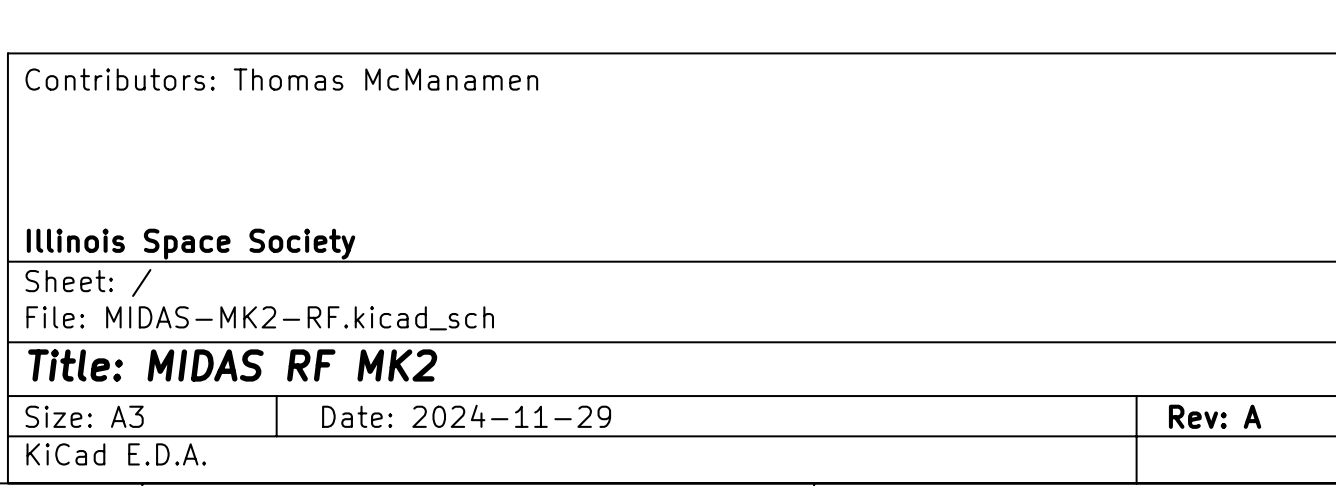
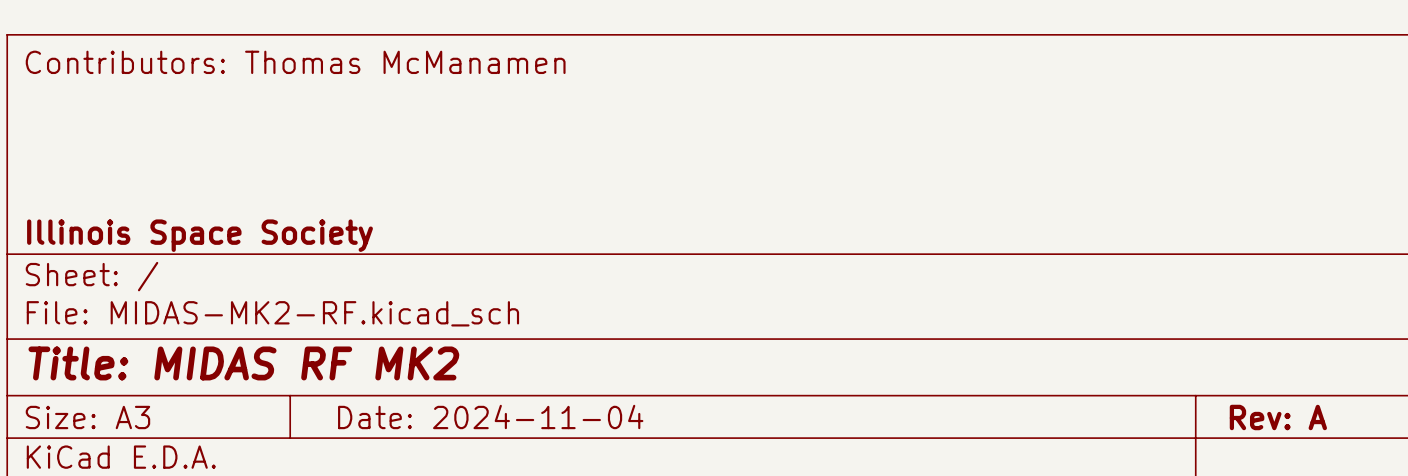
title block: Date: 2024-11-29 (466, 416) -> Date: 2024-11-04 (490, 416)

